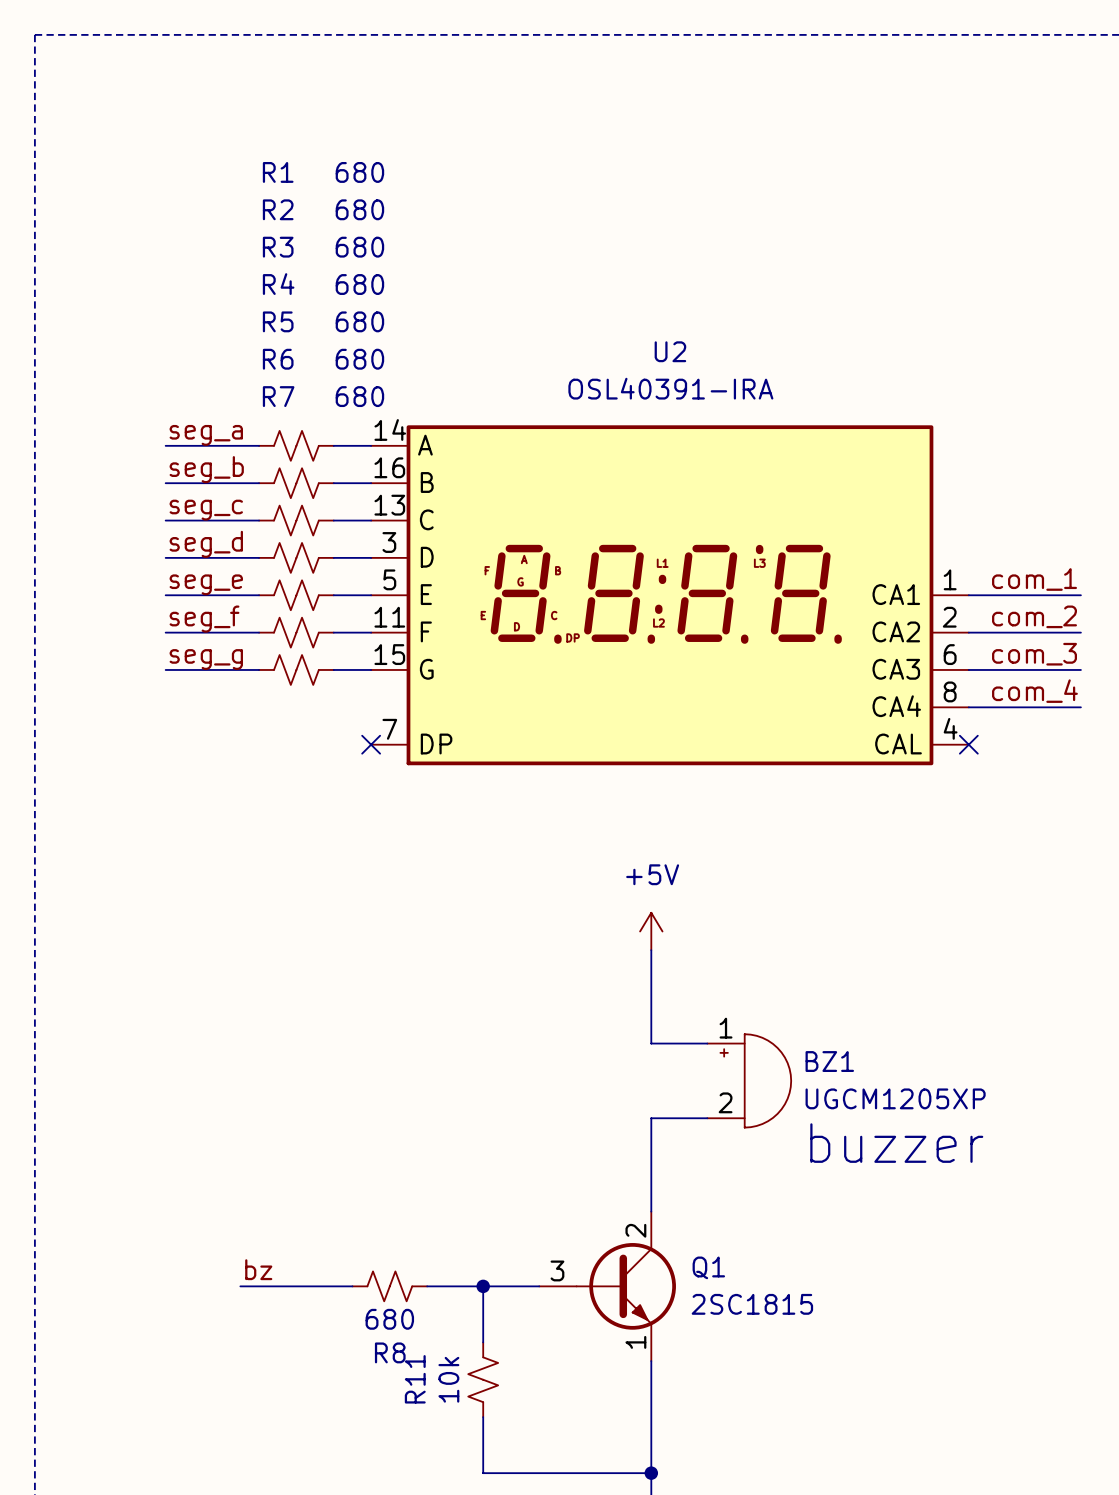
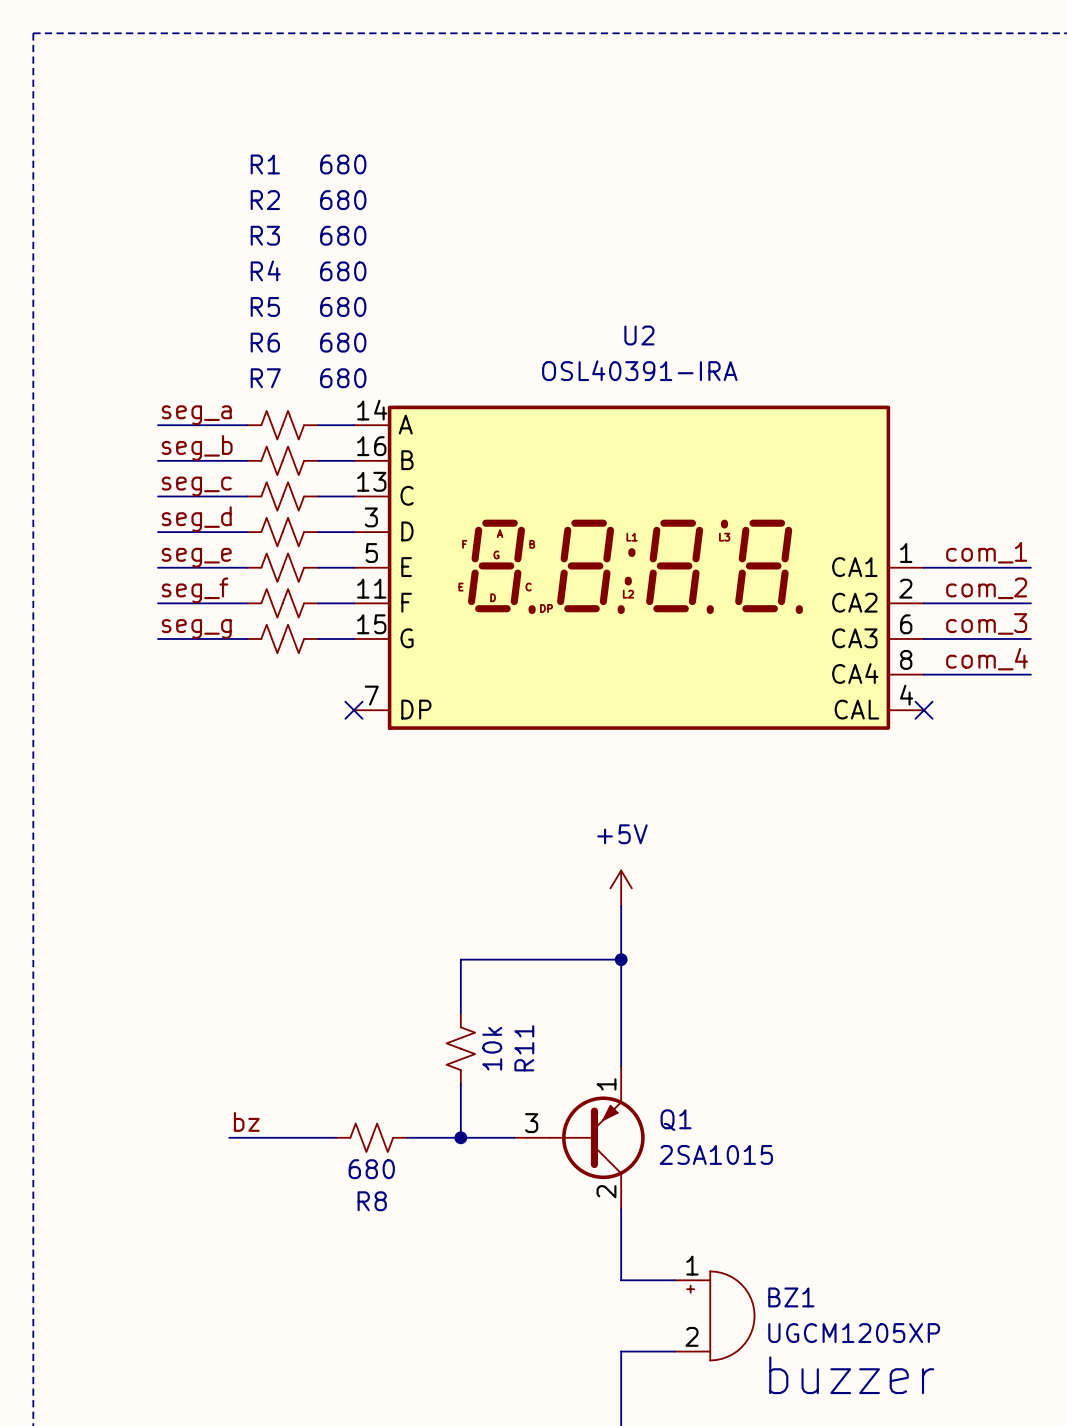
wire: none -> (621, 959) (460, 959) (460, 1013)
junction: none -> (621, 959)
wire: (651, 1043) (707, 1043) -> (621, 995) (621, 1066)
BZ1 position: (749, 1080) -> (714, 1315)
wire: (707, 1118) (651, 1118) (651, 1211) -> none
text position: buzzer (896, 1143) -> buzzer (851, 1375)
junction: none -> (460, 1137)
Q1 symbol: [539, 1211, 676, 1362] -> [514, 1066, 645, 1210]
wire: none -> (621, 1209) (621, 1280) (674, 1280)
label position: bz (258, 1269) -> bz (246, 1121)
wire: (240, 1286) (352, 1286) -> (229, 1137) (336, 1137)
R8 position: (389, 1286) -> (371, 1137)
wire: (427, 1286) (539, 1286) -> (407, 1137) (514, 1137)
wire: (483, 1286) (483, 1342) -> (460, 1084) (460, 1137)
junction: (483, 1286) -> none
Q1 value: 2SC1815 (752, 1304) -> 2SA1015 (716, 1154)
wire: (651, 1361) (651, 1417) -> (674, 1351) (621, 1351)
R11 name position: R11 (415, 1379) -> R11 (524, 1048)
R11 value position: 10k (448, 1379) -> 10k (492, 1048)
R11 position: (483, 1379) -> (460, 1048)
wire: (483, 1417) (483, 1473) (651, 1473) -> none
junction: (651, 1473) -> none

